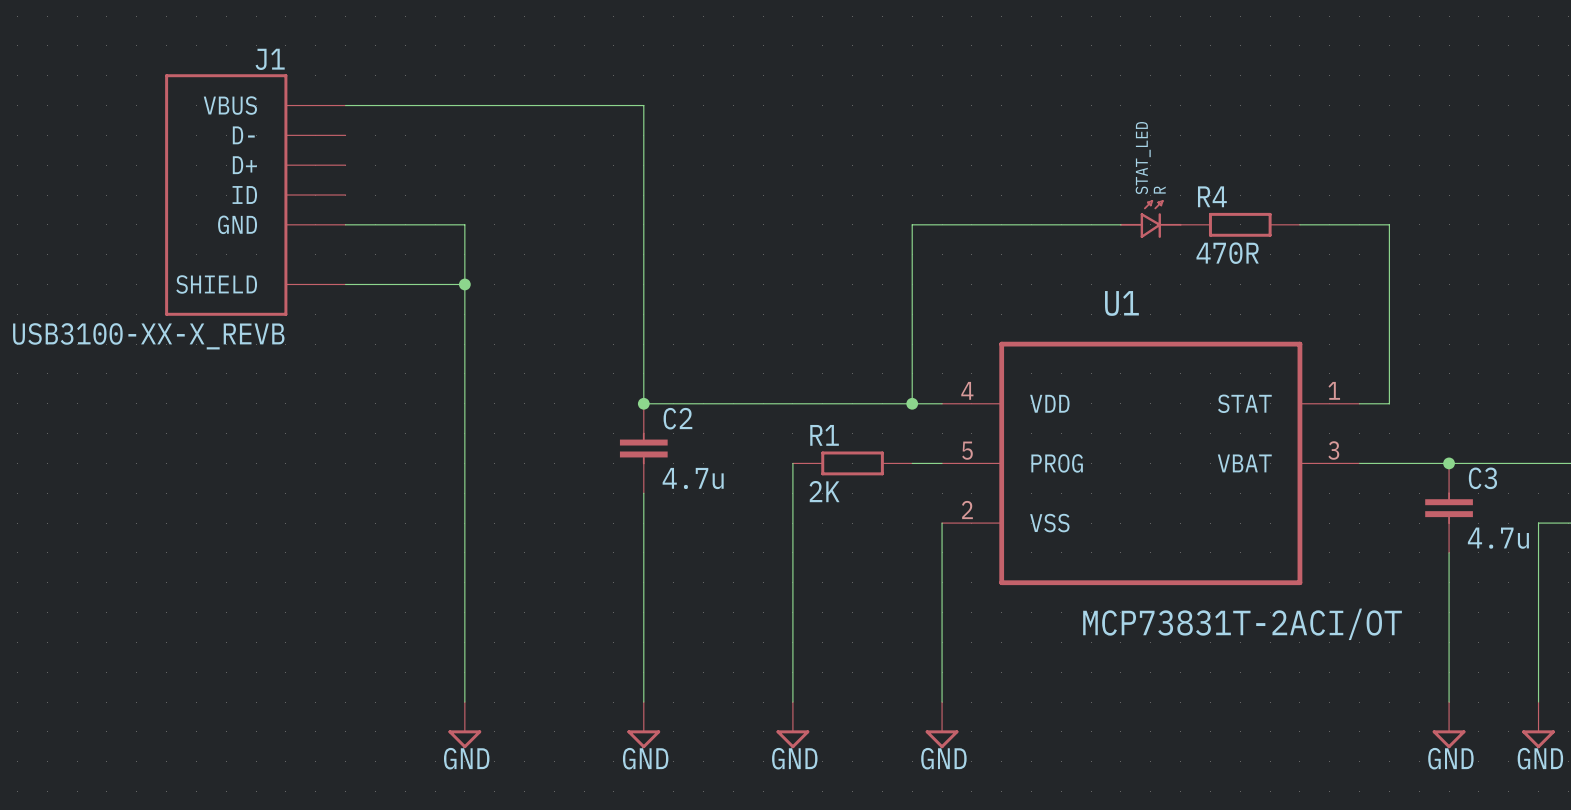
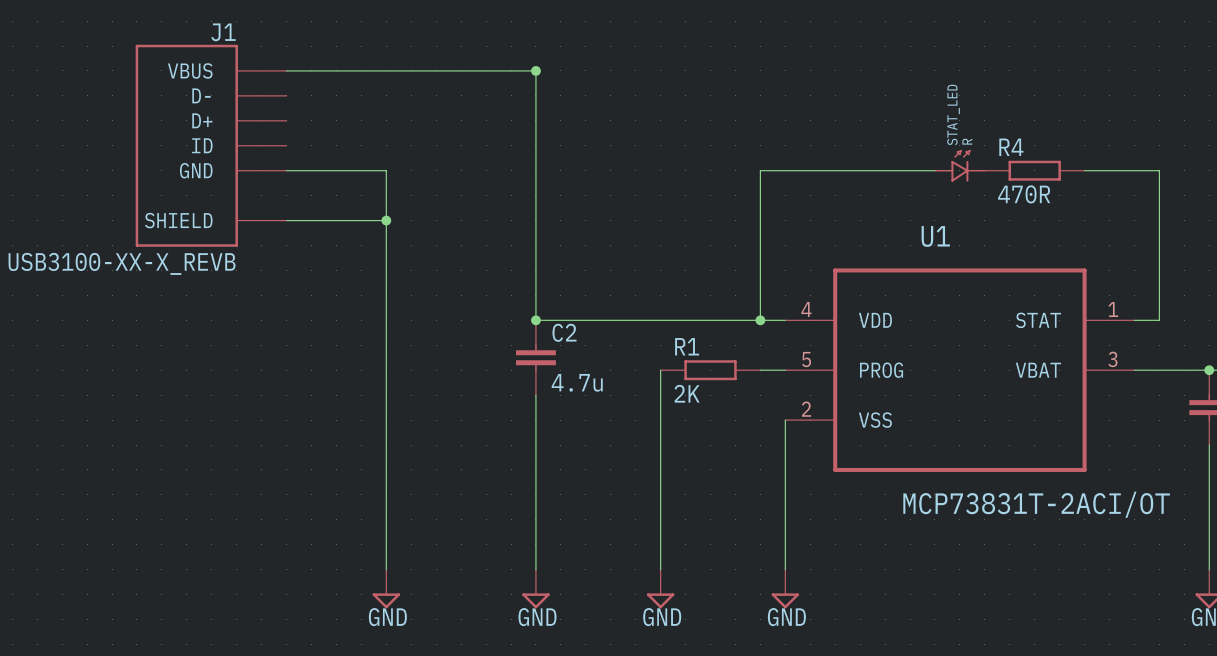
junction: none -> (535, 70)

